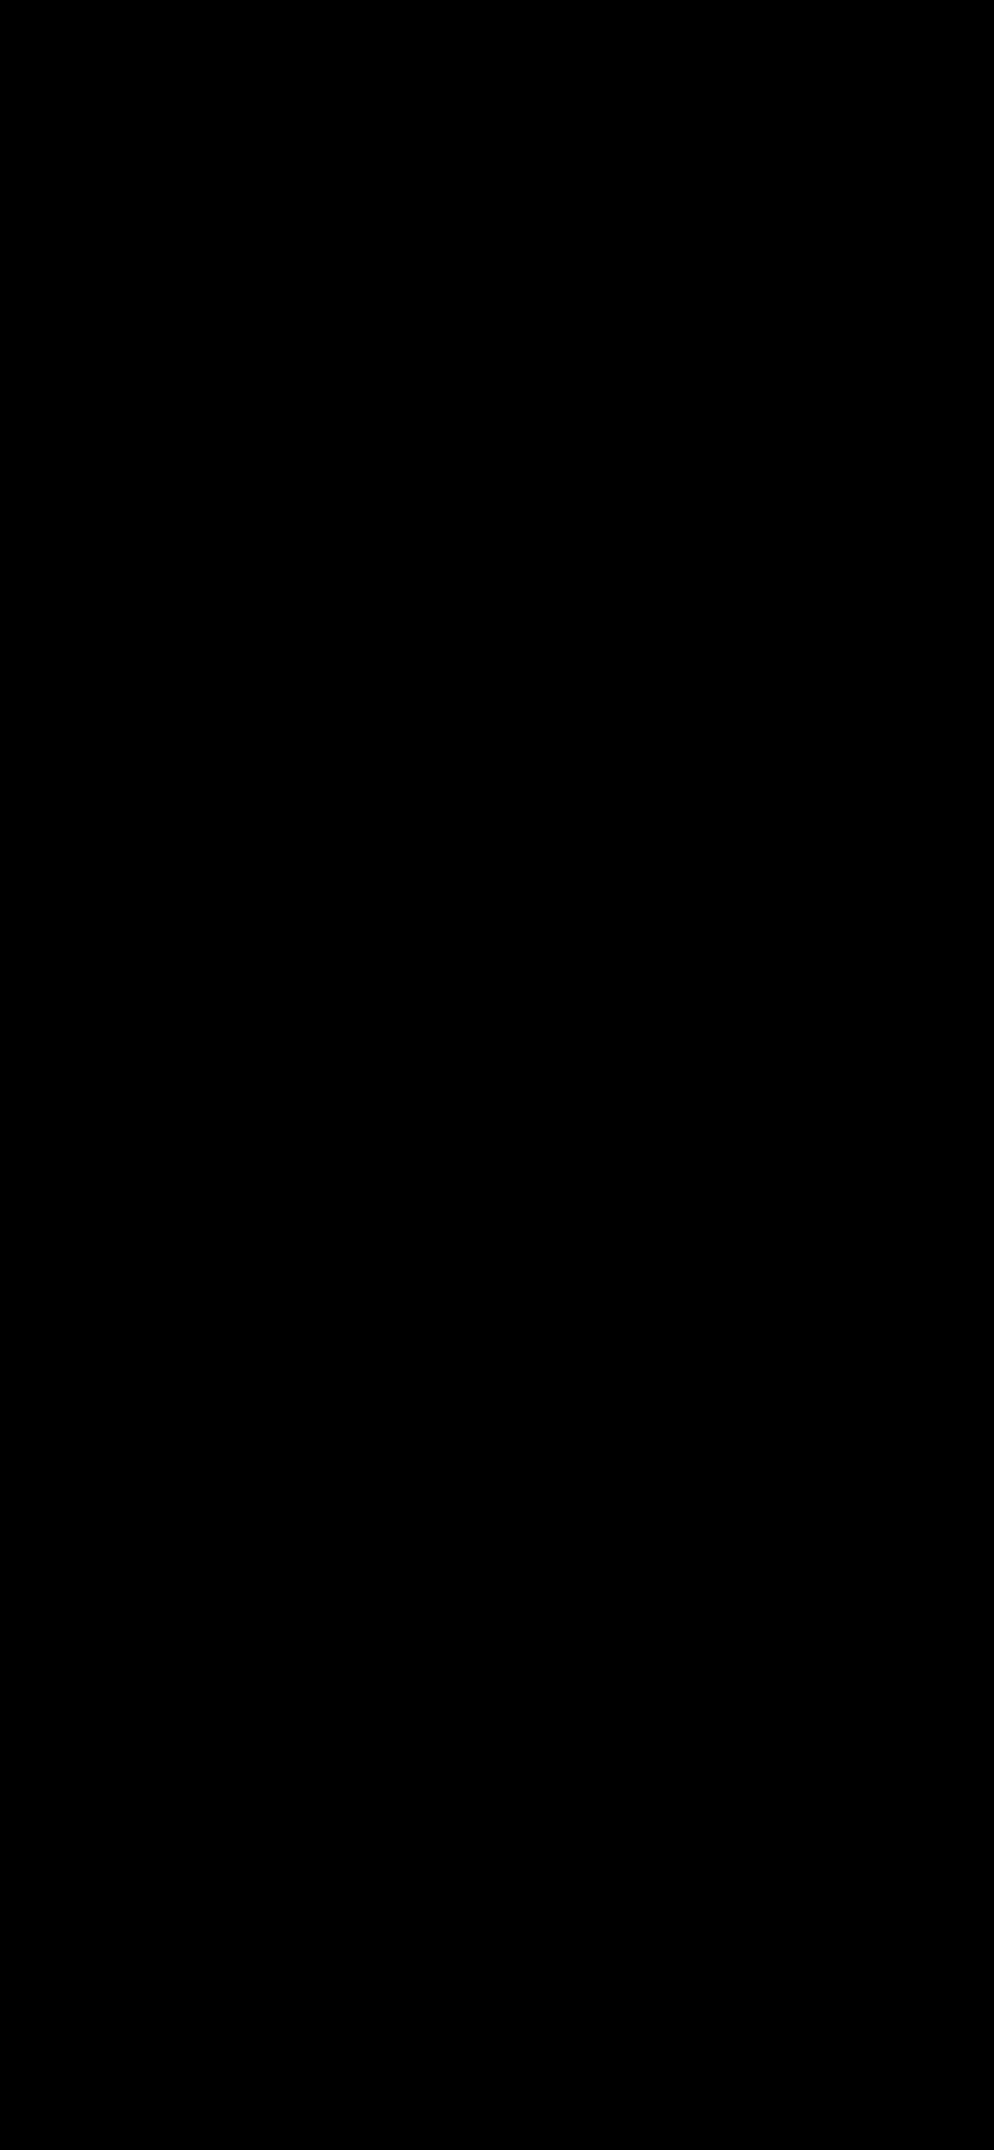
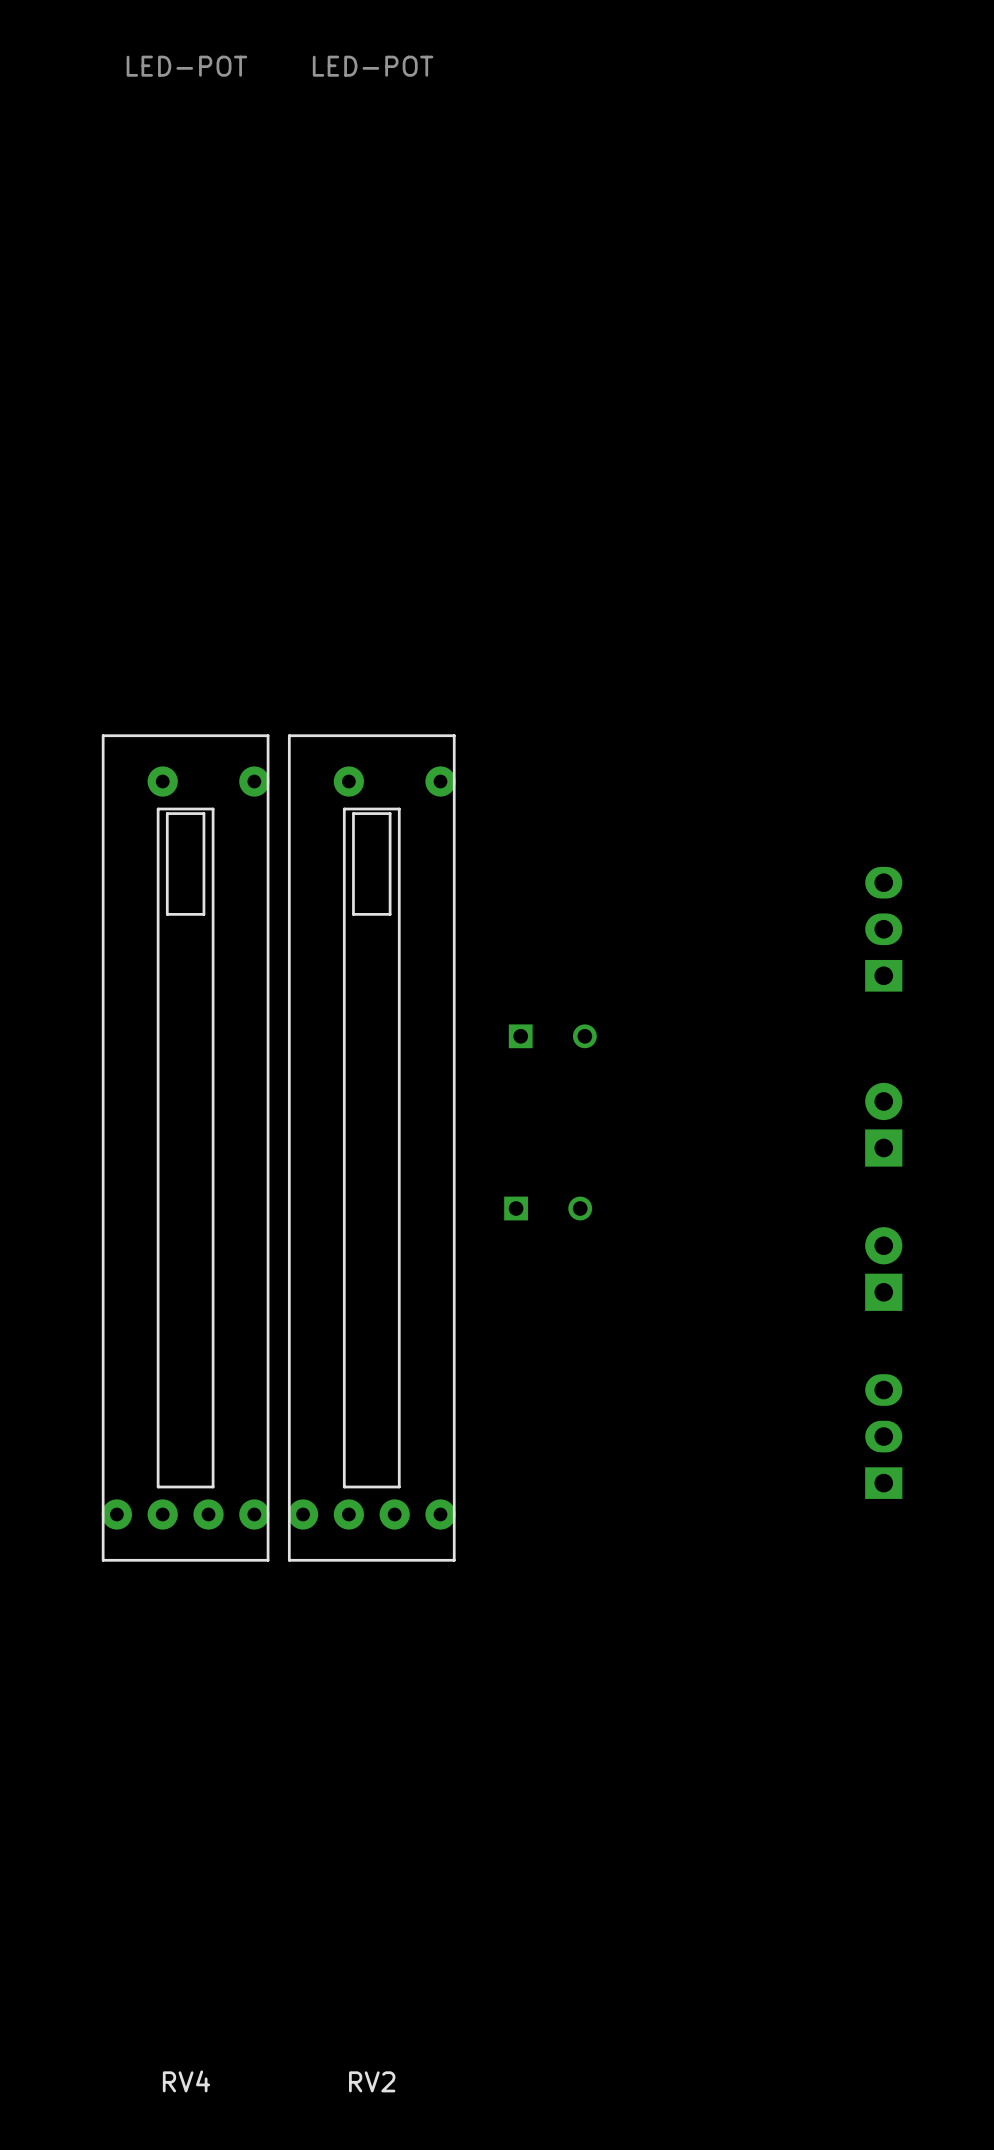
part: none -> (883, 929)
part: none -> (552, 1036)
part: none -> (883, 1124)
RV4: none -> LED-POT (185, 1148)
RV2: none -> LED-POT (371, 1148)
part: none -> (548, 1208)
part: none -> (883, 1269)
part: none -> (883, 1436)

